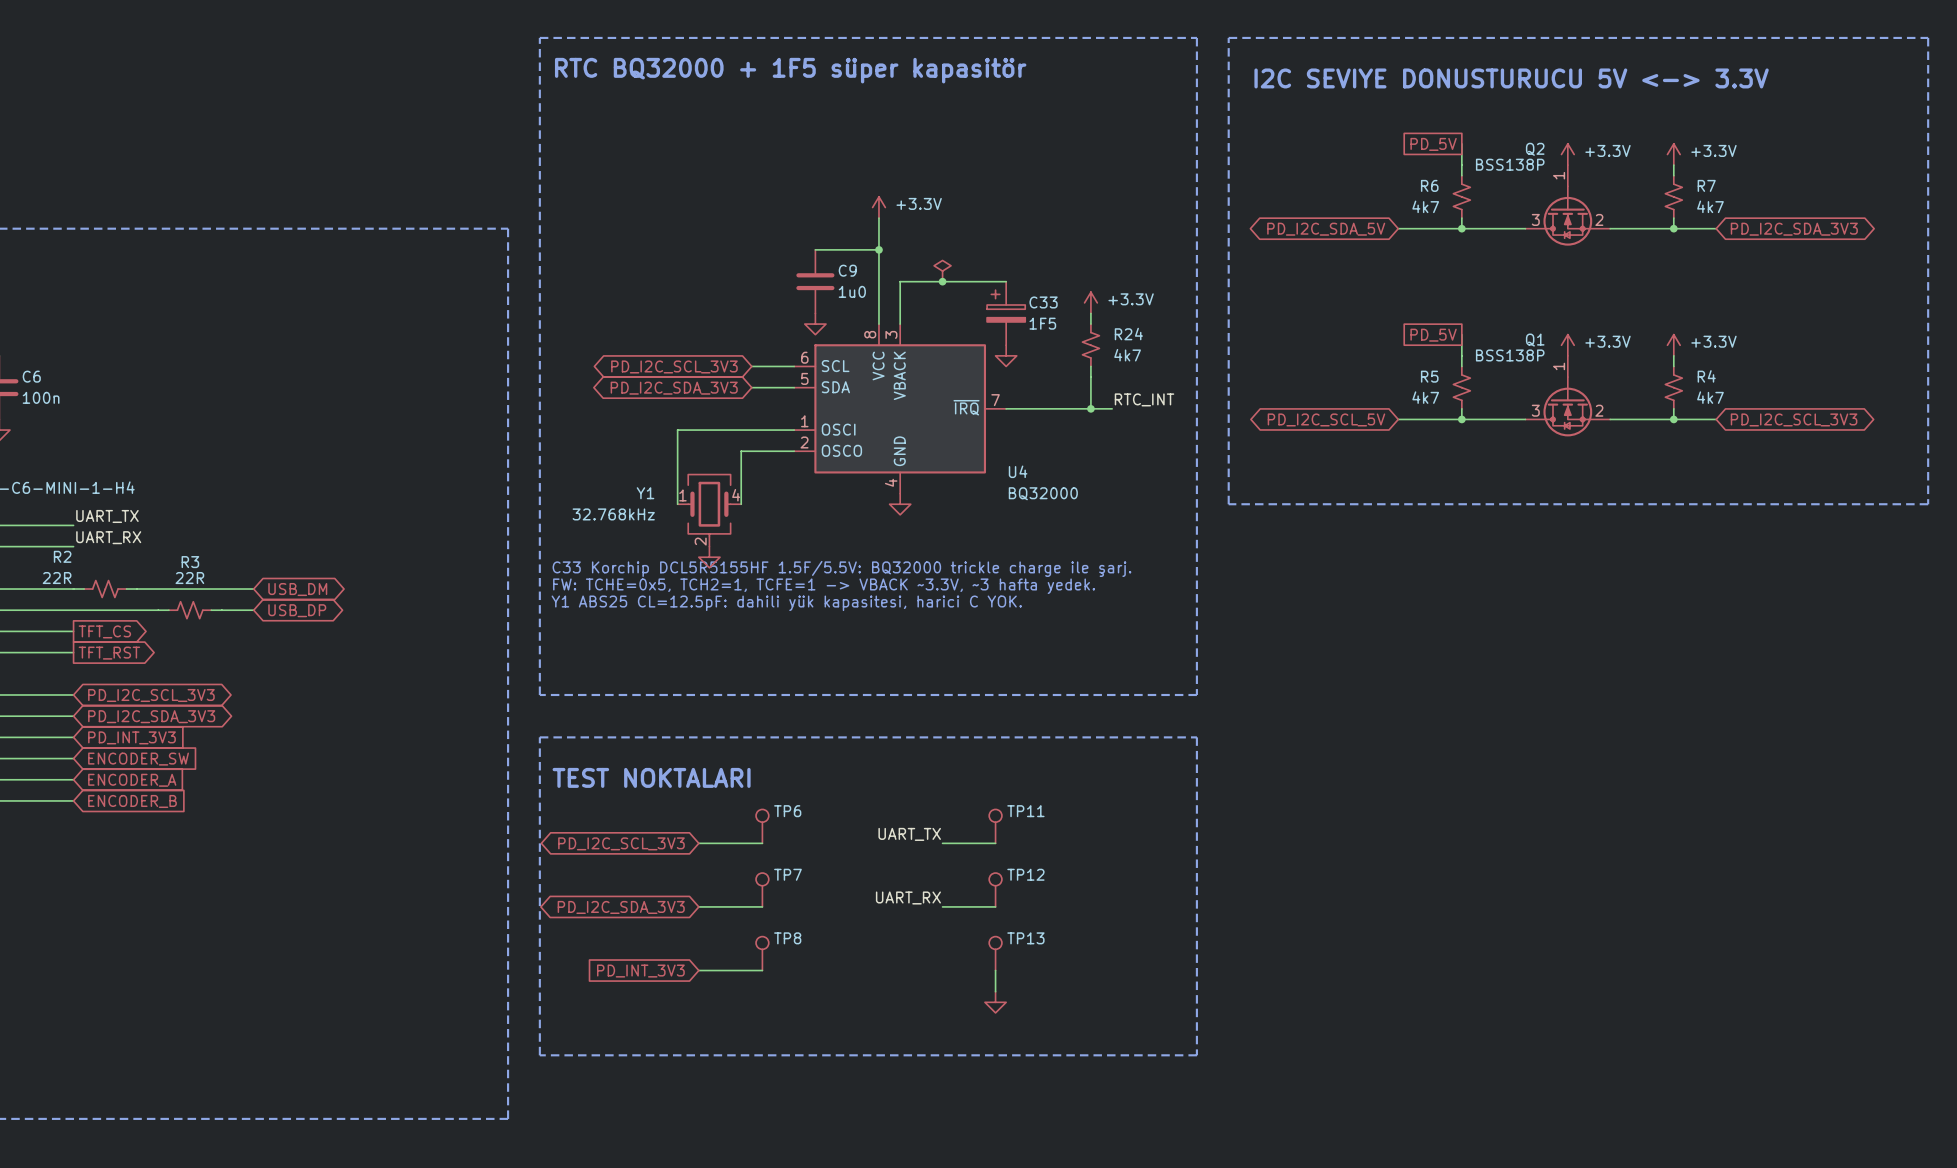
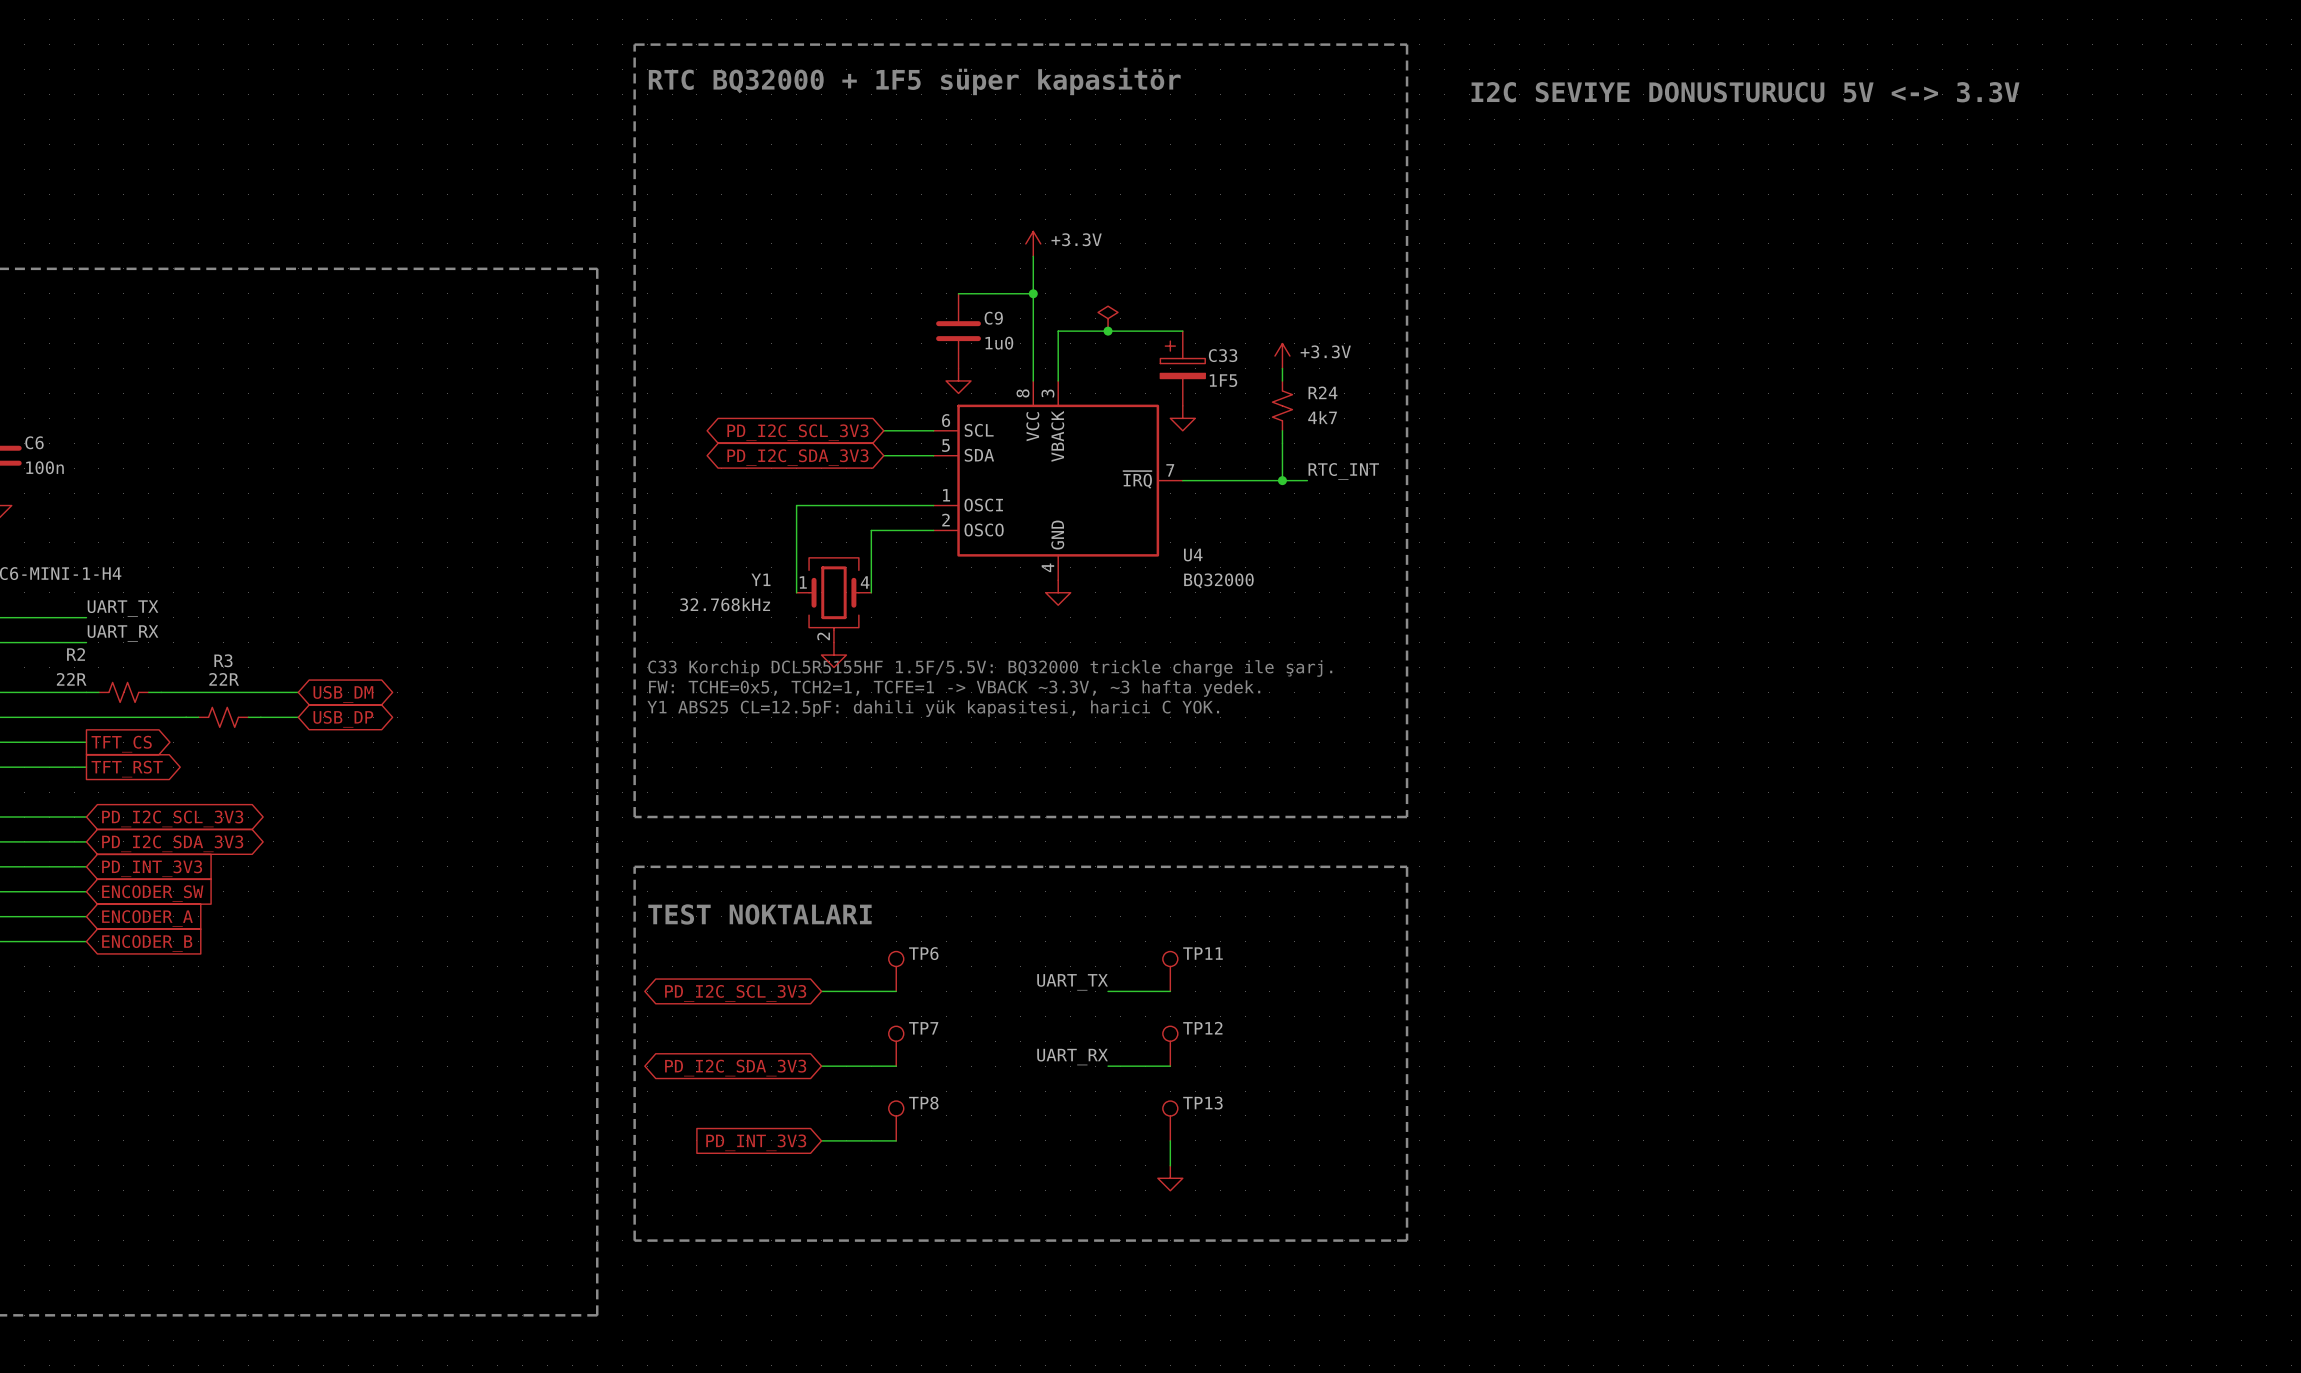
line: (1228, 37) (1928, 37) (1928, 504) (1228, 504) (1228, 37) -> none
wire: (1461, 143) (1461, 175) -> none
global label: PD_5V (1433, 144) -> none
power symbol: +3.3V (1567, 154) -> none
power symbol: +3.3V (1673, 154) -> none
wire: (1673, 165) (1673, 175) -> none
R6: 4k7 (1461, 196) -> none
R7: 4k7 (1673, 196) -> none
Q2: BSS138P (1567, 205) -> none
wire: (1461, 218) (1461, 228) -> none
wire: (1673, 218) (1673, 228) -> none
wire: (1398, 228) (1525, 228) -> none
junction: (1461, 228) -> none
wire: (1610, 228) (1716, 228) -> none
junction: (1673, 228) -> none
global label: PD_I2C_SDA_5V (1326, 229) -> none
global label: PD_I2C_SDA_3V3 (1794, 229) -> none
wire: (1461, 334) (1461, 366) -> none
global label: PD_5V (1433, 335) -> none
power symbol: +3.3V (1567, 345) -> none
power symbol: +3.3V (1673, 345) -> none
wire: (1673, 355) (1673, 366) -> none
R5: 4k7 (1461, 387) -> none
R4: 4k7 (1673, 387) -> none
Q1: BSS138P (1567, 396) -> none
wire: (1461, 408) (1461, 419) -> none
wire: (1673, 408) (1673, 419) -> none
global label: PD_I2C_SCL_5V (1326, 419) -> none
wire: (1398, 419) (1525, 419) -> none
junction: (1461, 419) -> none
wire: (1610, 419) (1716, 419) -> none
junction: (1673, 419) -> none
global label: PD_I2C_SCL_3V3 (1794, 419) -> none

